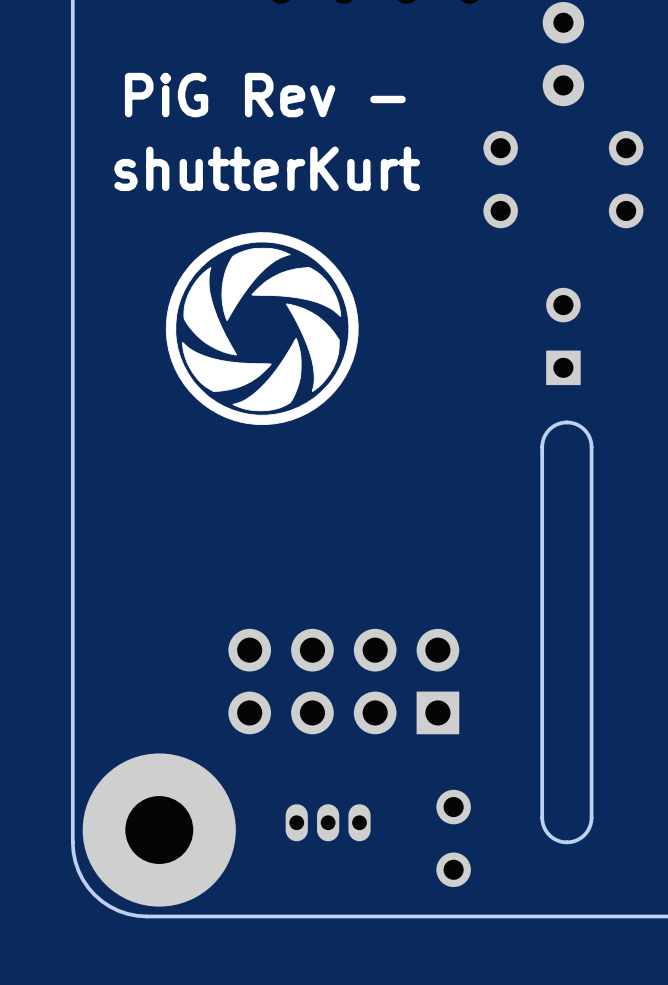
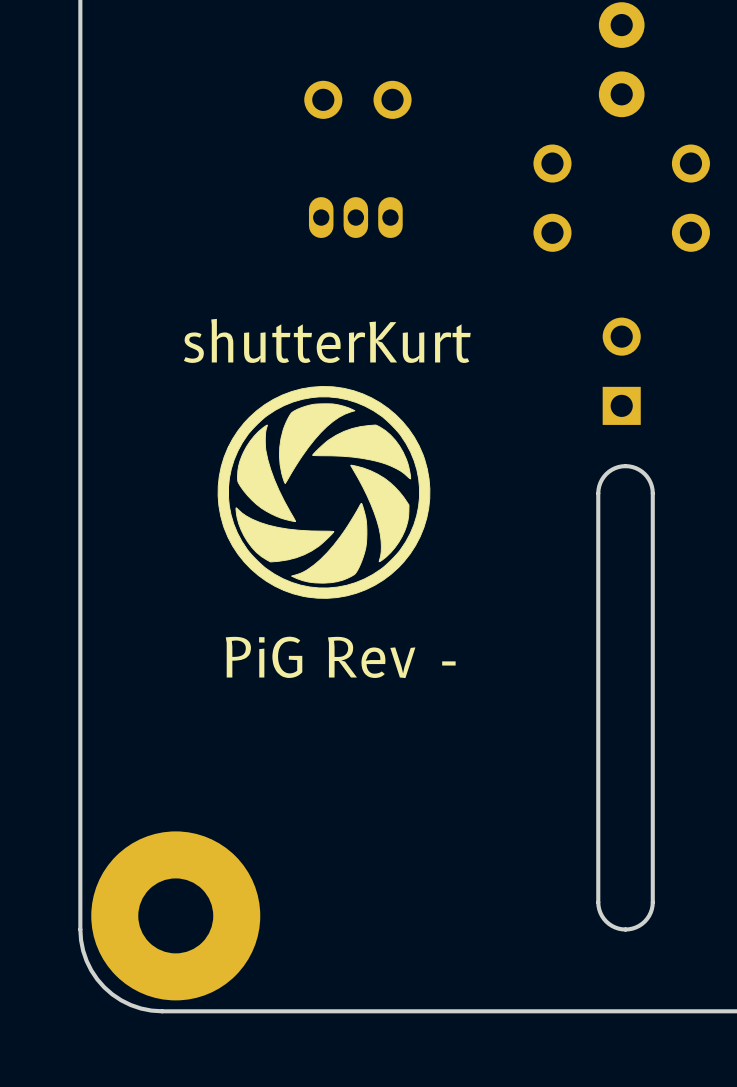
part: none -> (357, 99)
text position: PiG Rev - (265, 95) -> PiG Rev - (340, 657)
text position: shutterKurt (267, 168) -> shutterKurt (327, 340)
part: none -> (355, 217)
drawing position: (262, 328) -> (323, 492)
part: (343, 681) -> none
part: (328, 822) -> none
part: (453, 838) -> none

